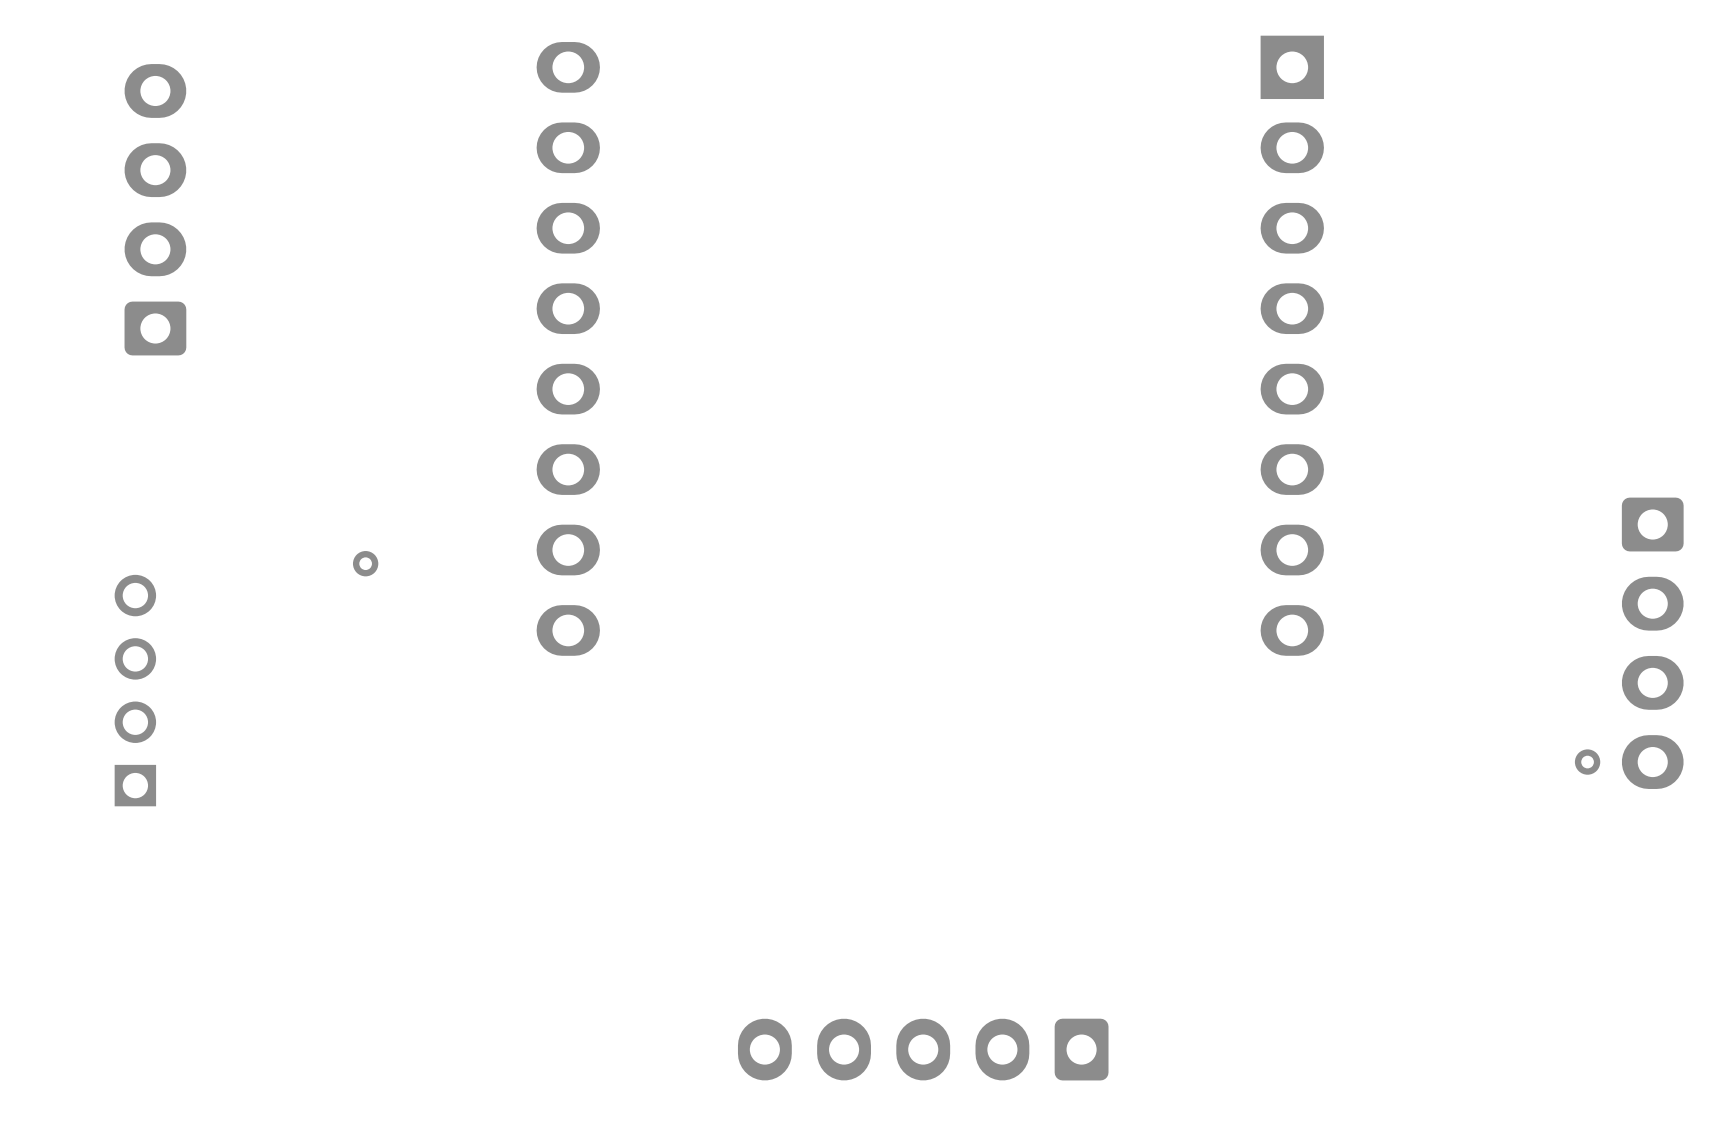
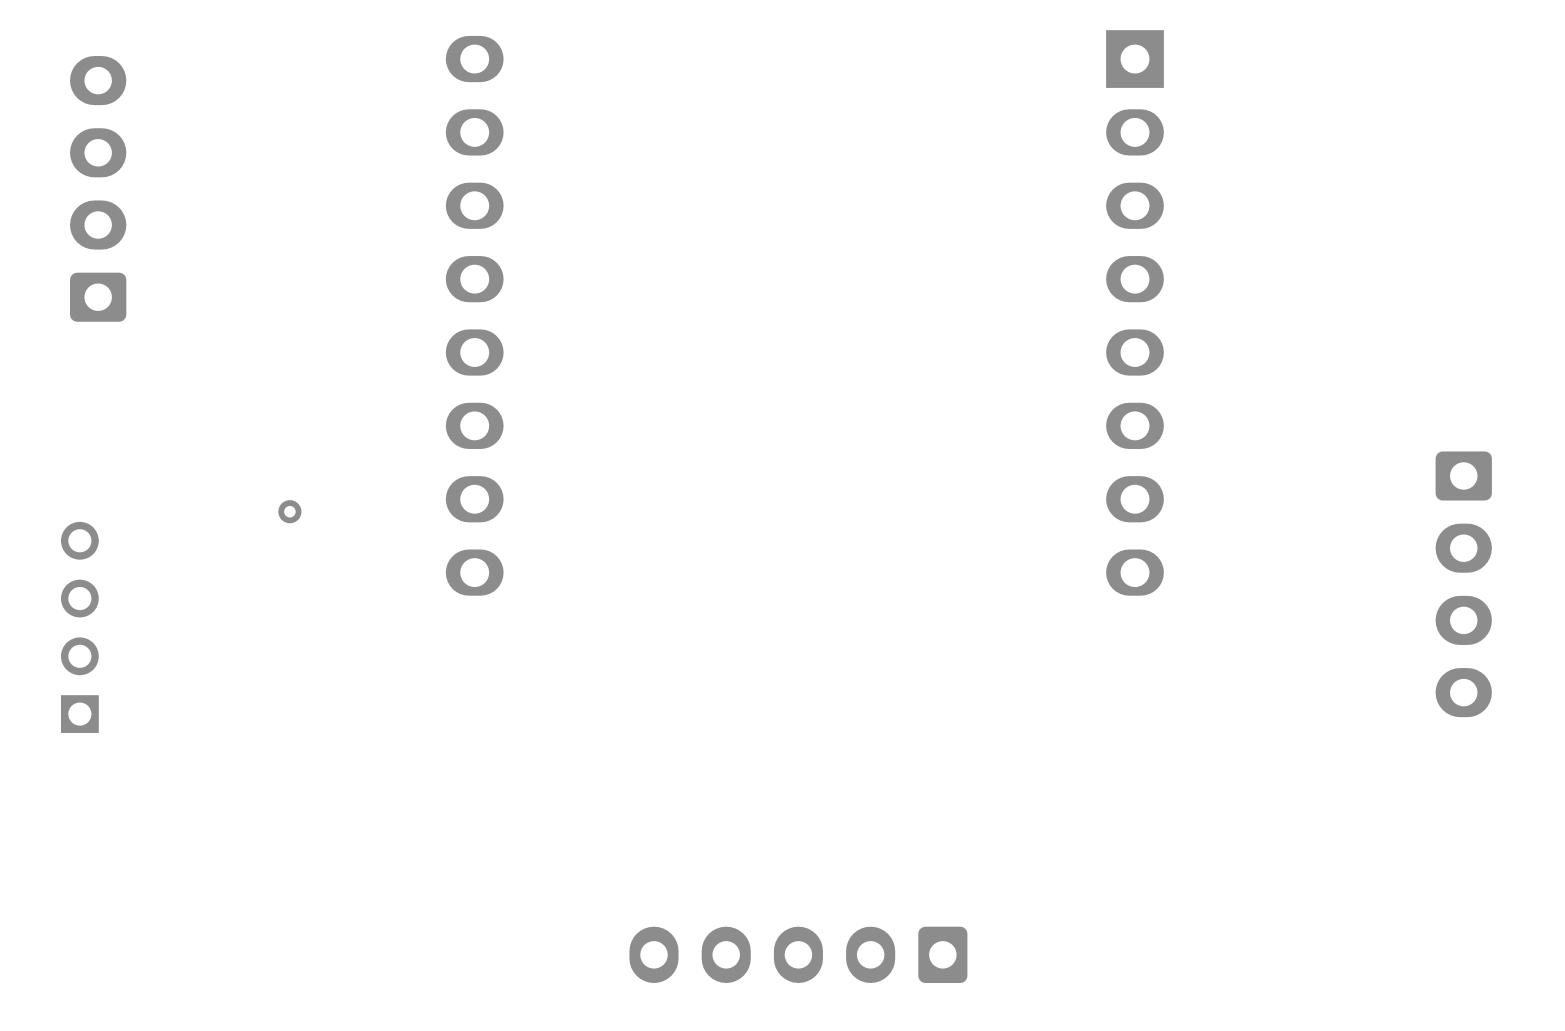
via: (1587, 762) -> none

